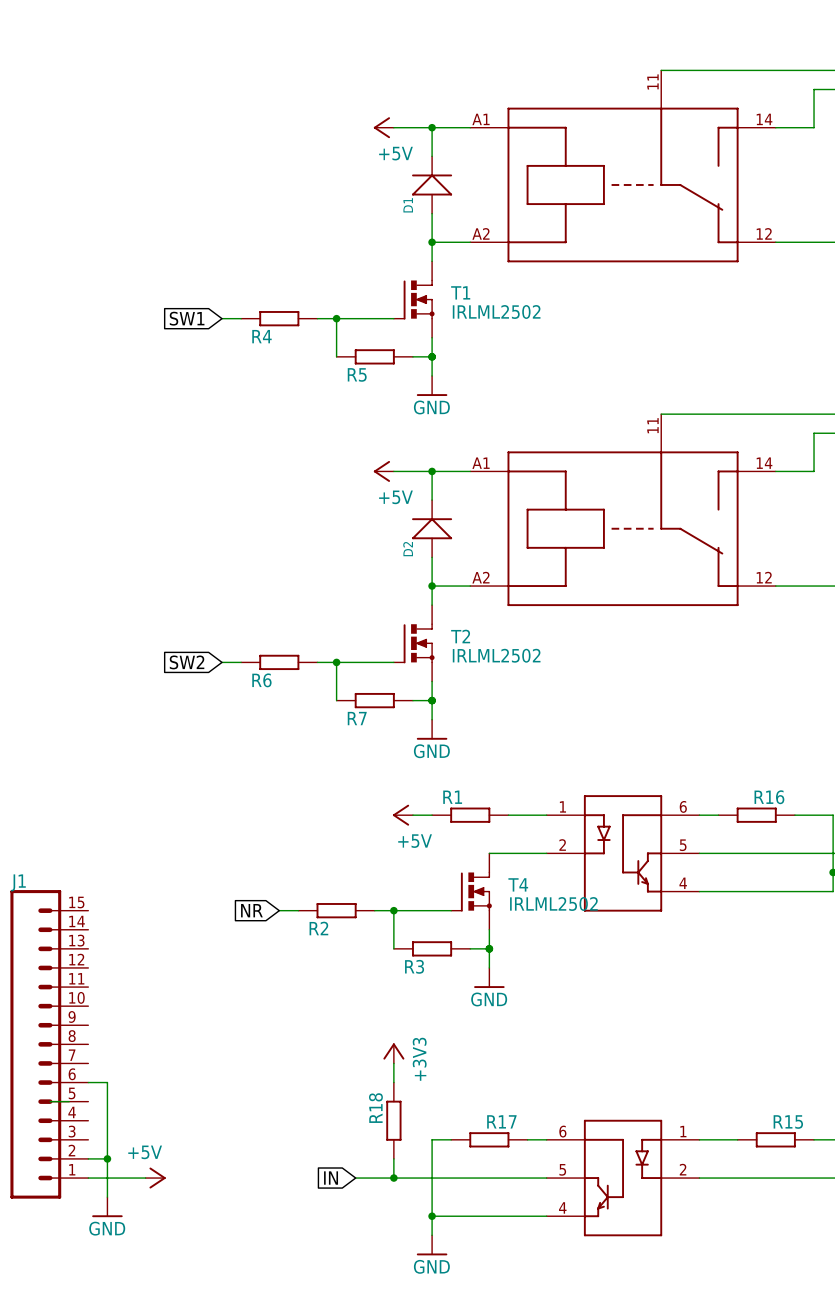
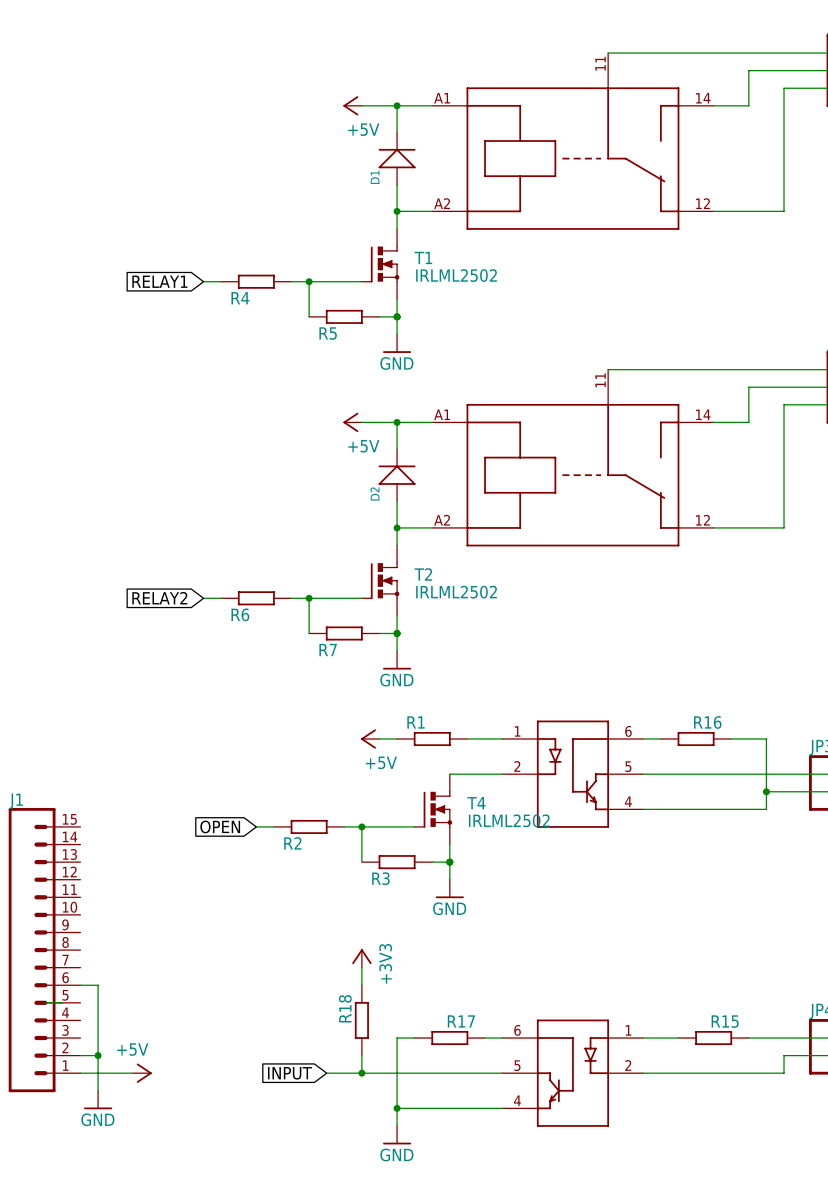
global label: SW1 (187, 318) -> RELAY1 (159, 281)
global label: SW2 (187, 662) -> RELAY2 (159, 598)
global label: NR (251, 910) -> OPEN (220, 826)
global label: IN (331, 1178) -> INPUT (289, 1073)

